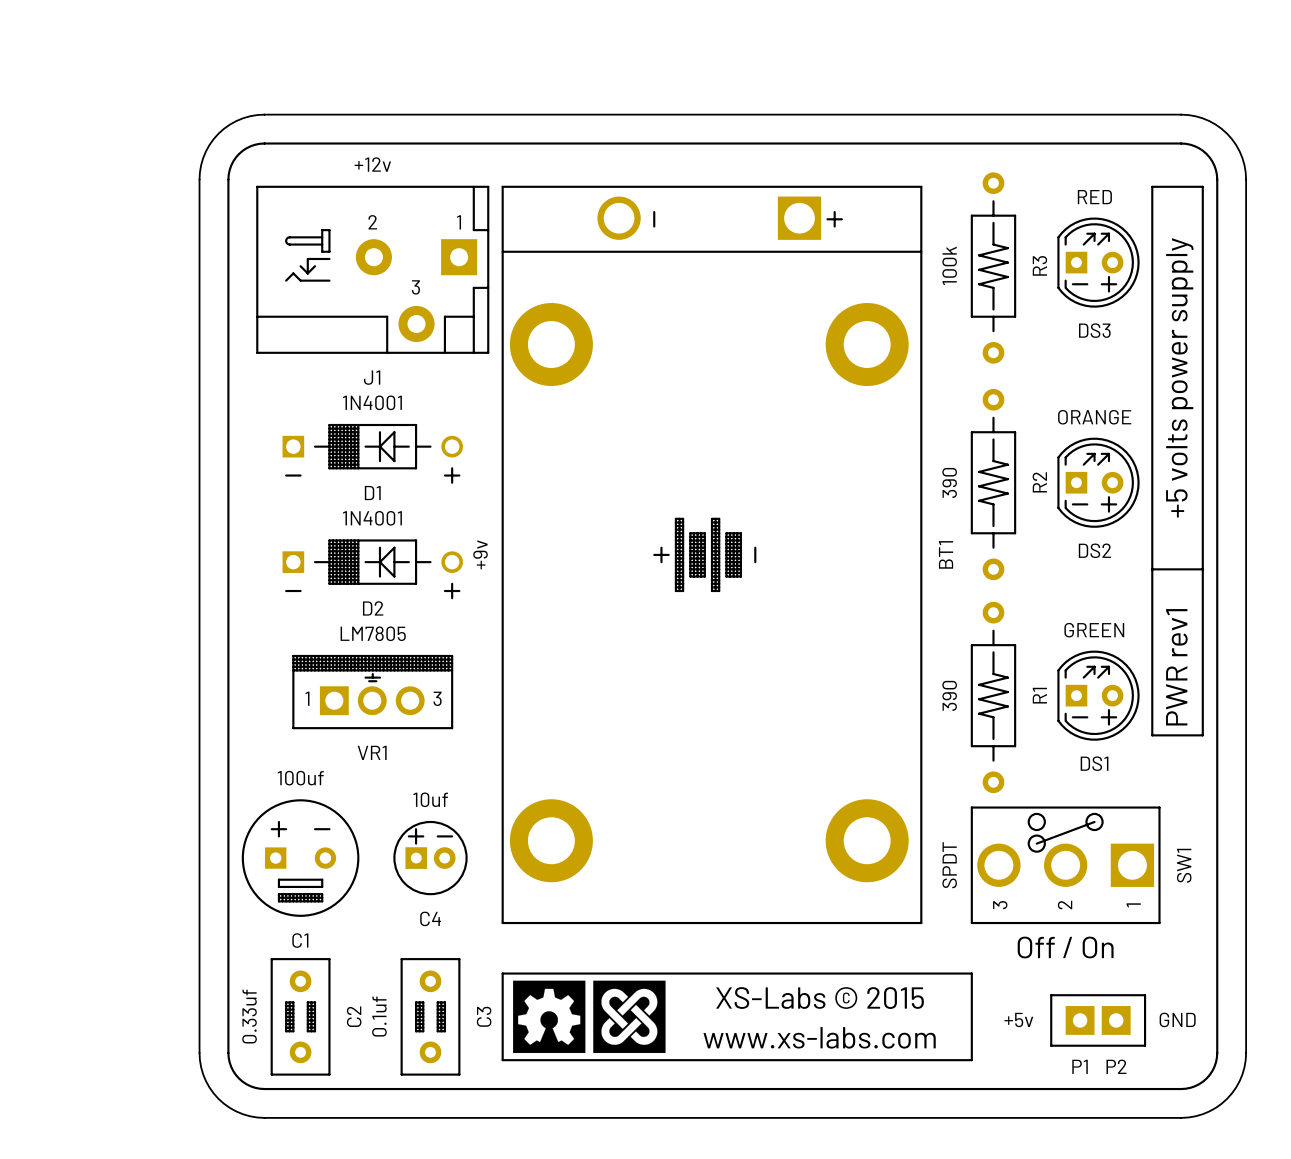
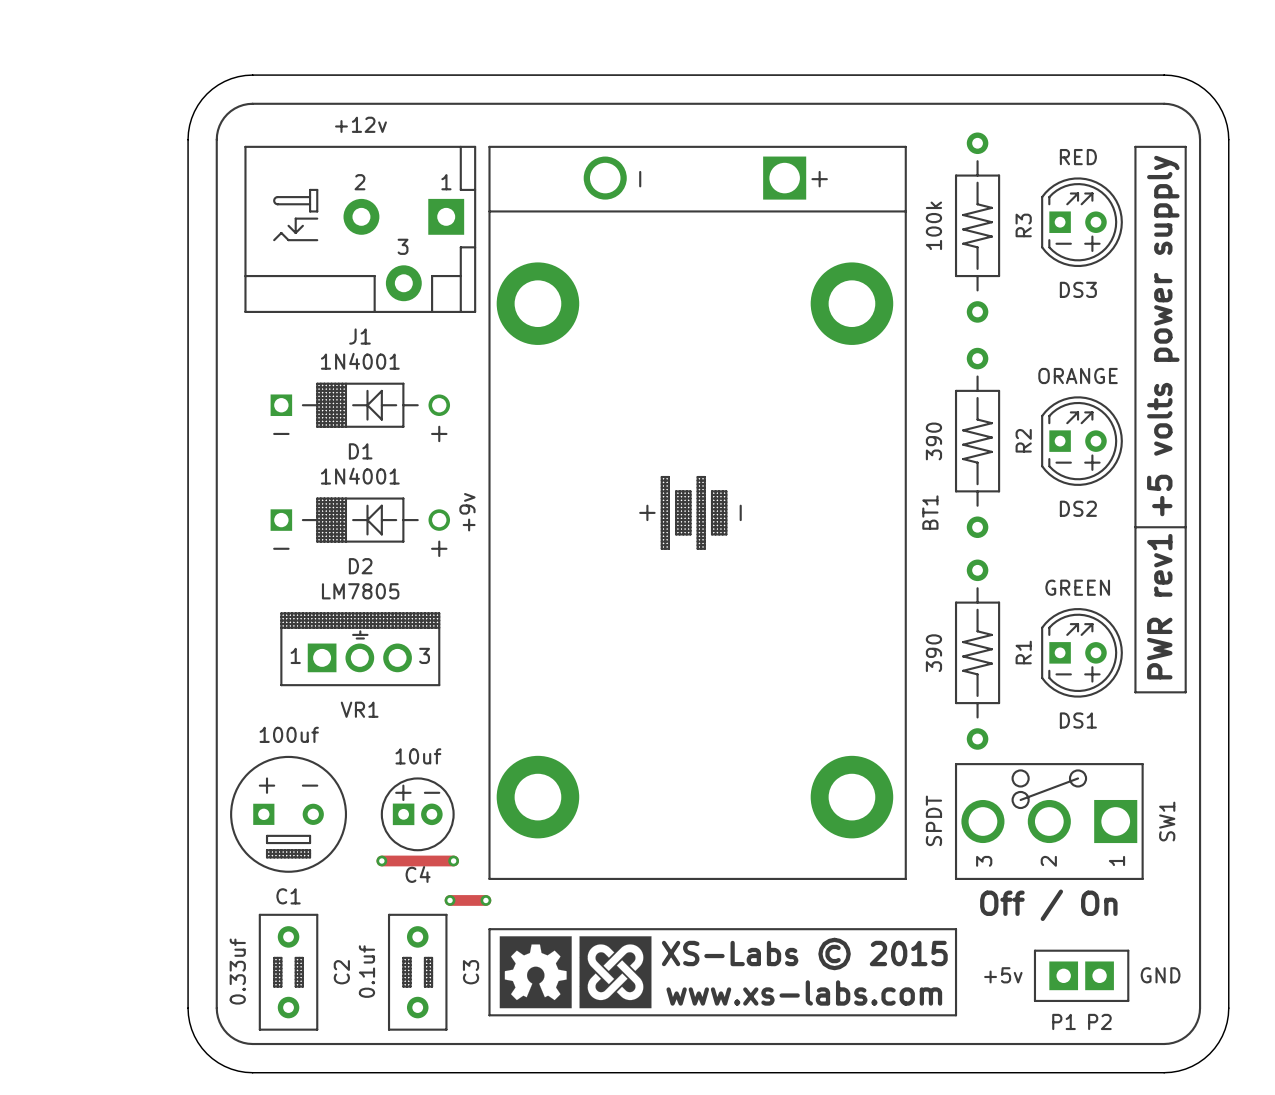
track: none -> (381, 860) (453, 860)
via: none -> (381, 860)
via: none -> (453, 860)
track: none -> (450, 900) (485, 900)
via: none -> (450, 900)
via: none -> (485, 900)

